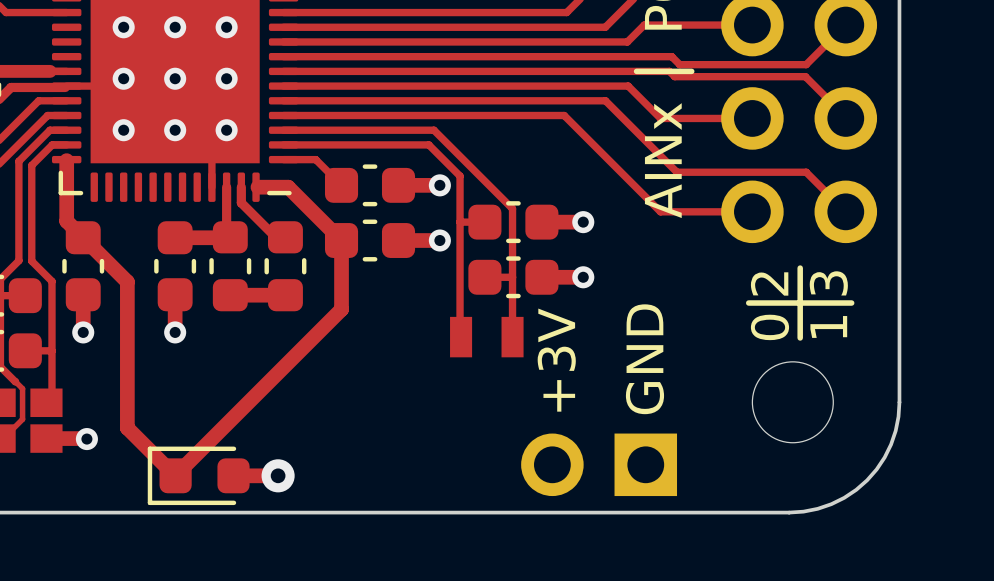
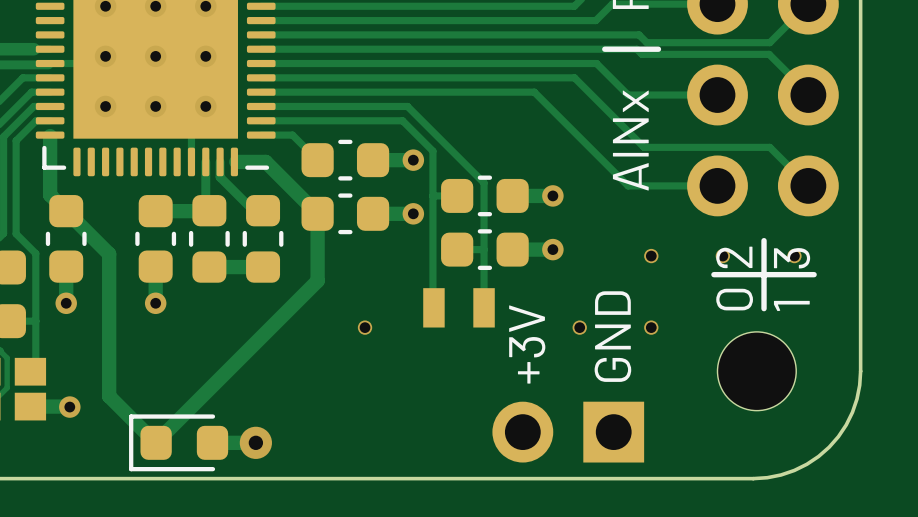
via: none -> (651, 256)
via: none -> (722, 256)
via: none -> (794, 256)
via: none -> (365, 327)
via: none -> (579, 327)
via: none -> (651, 327)

